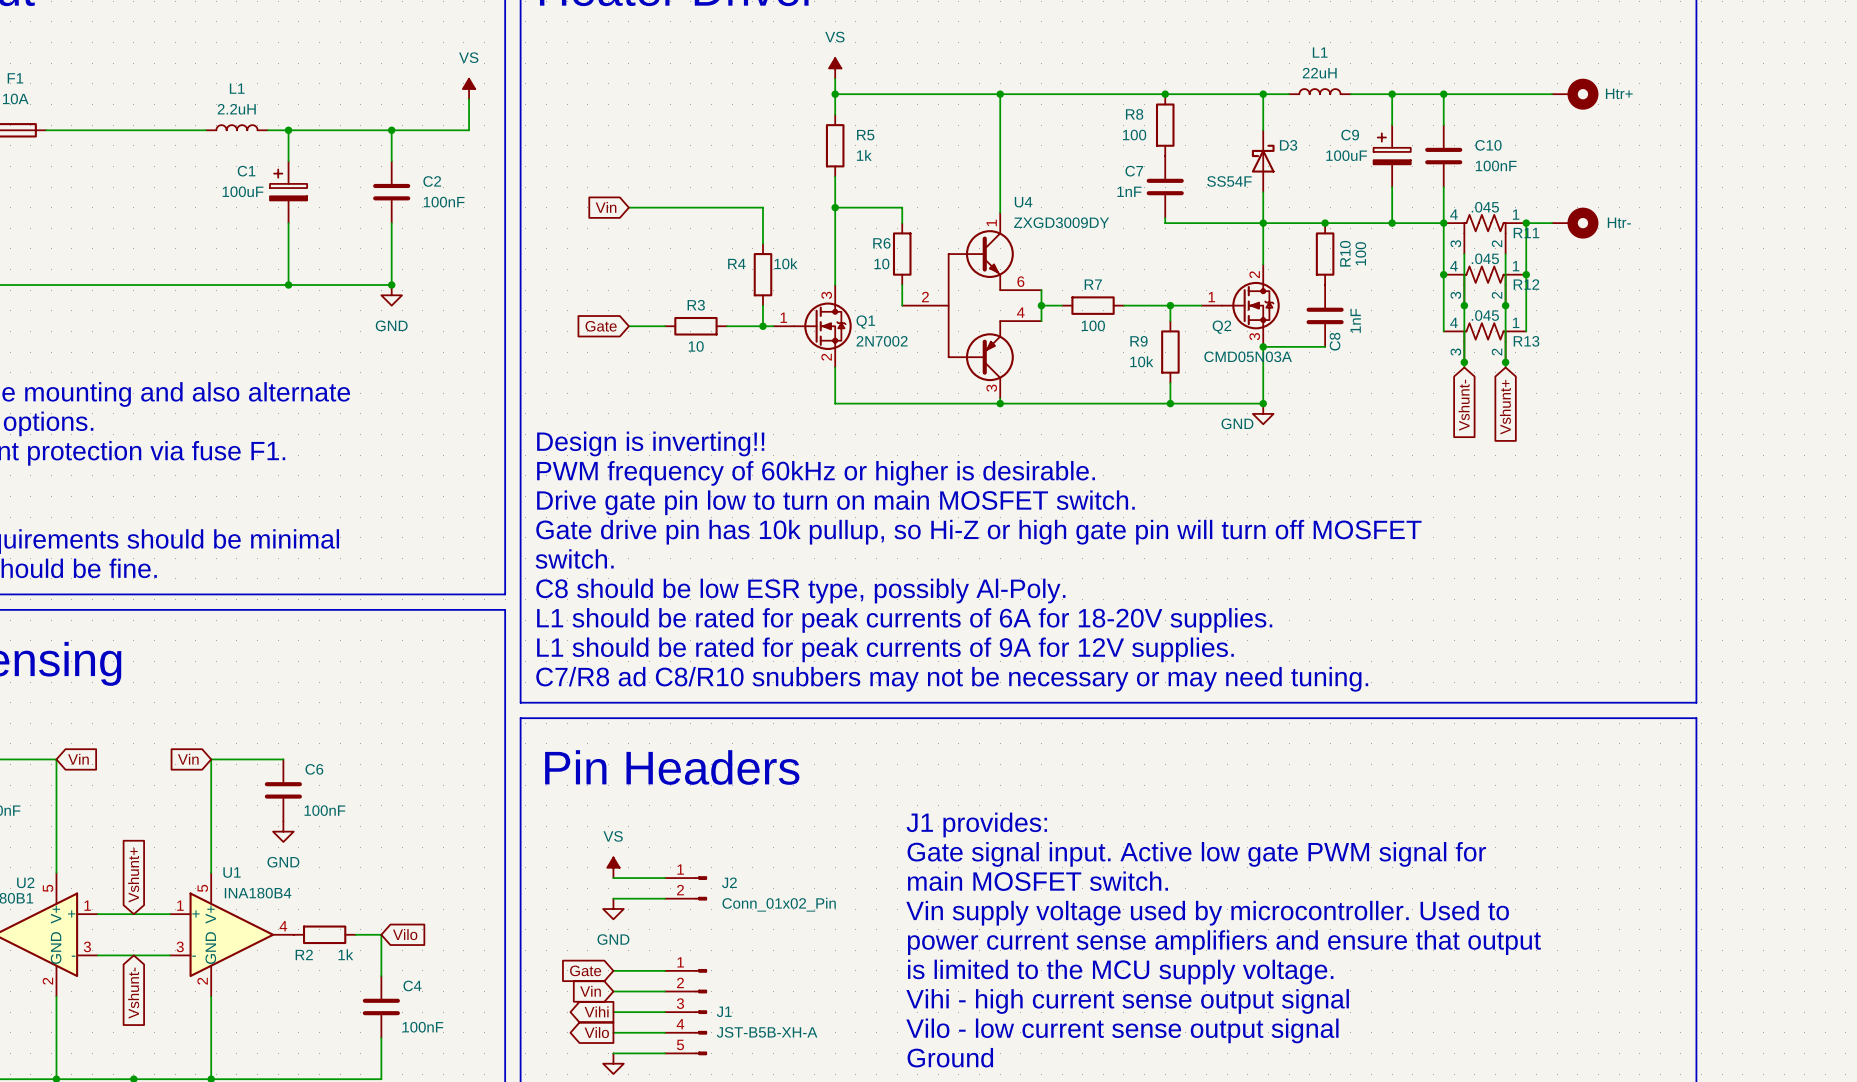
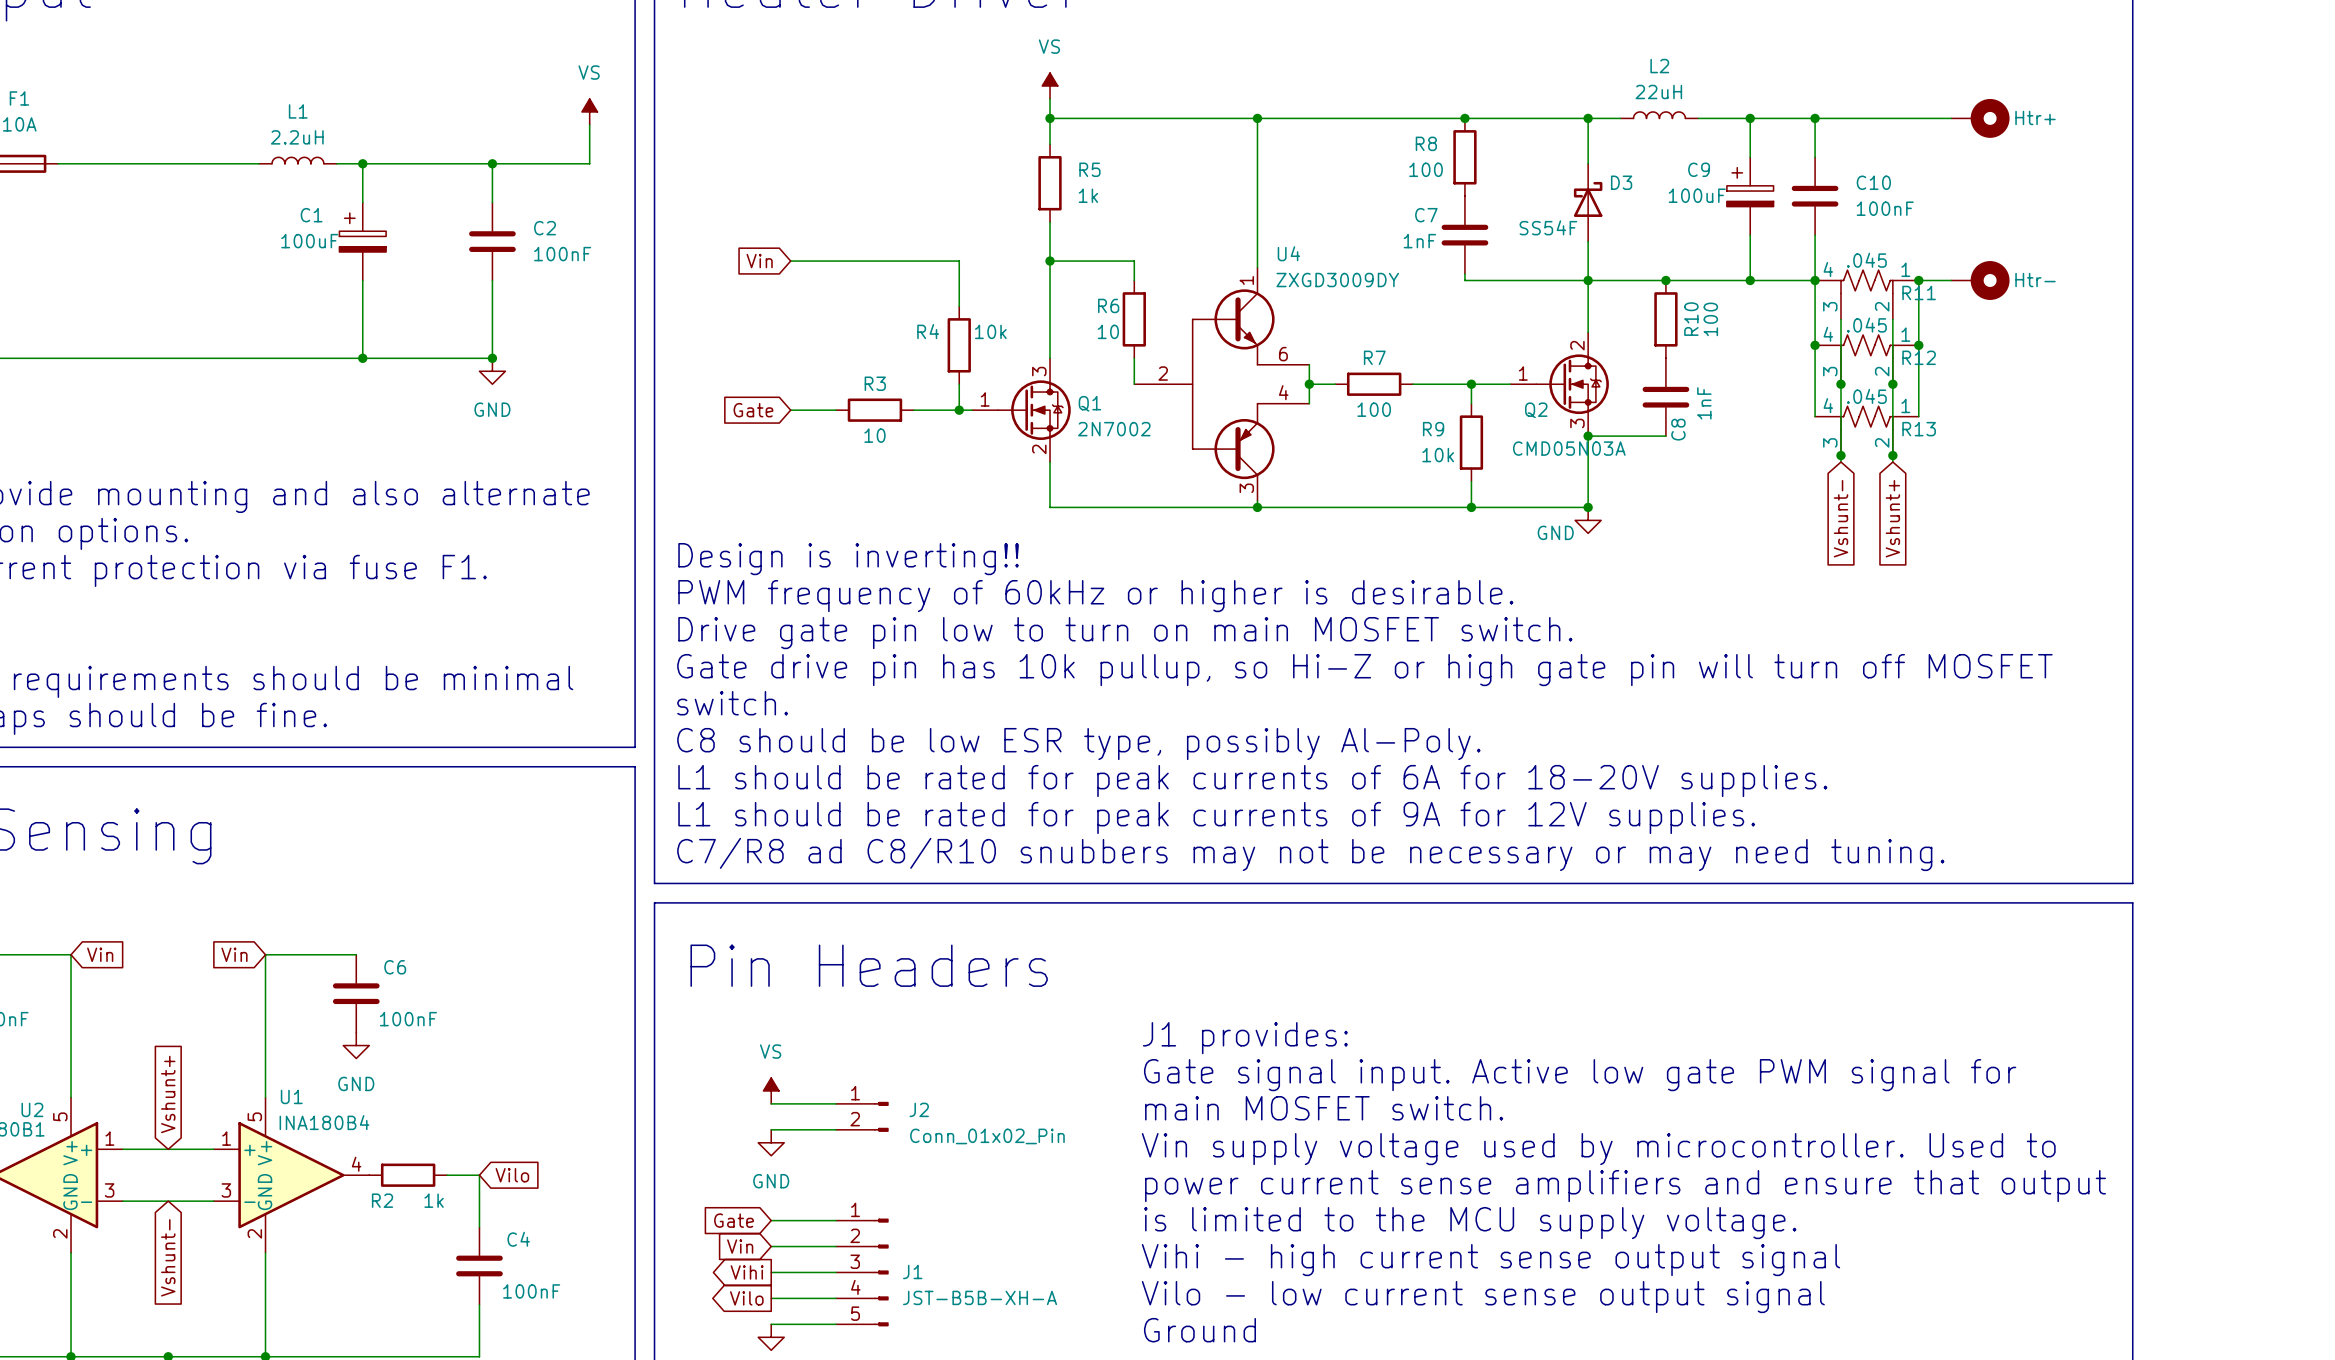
L1 name: L1 (1320, 52) -> L2 (1659, 66)

